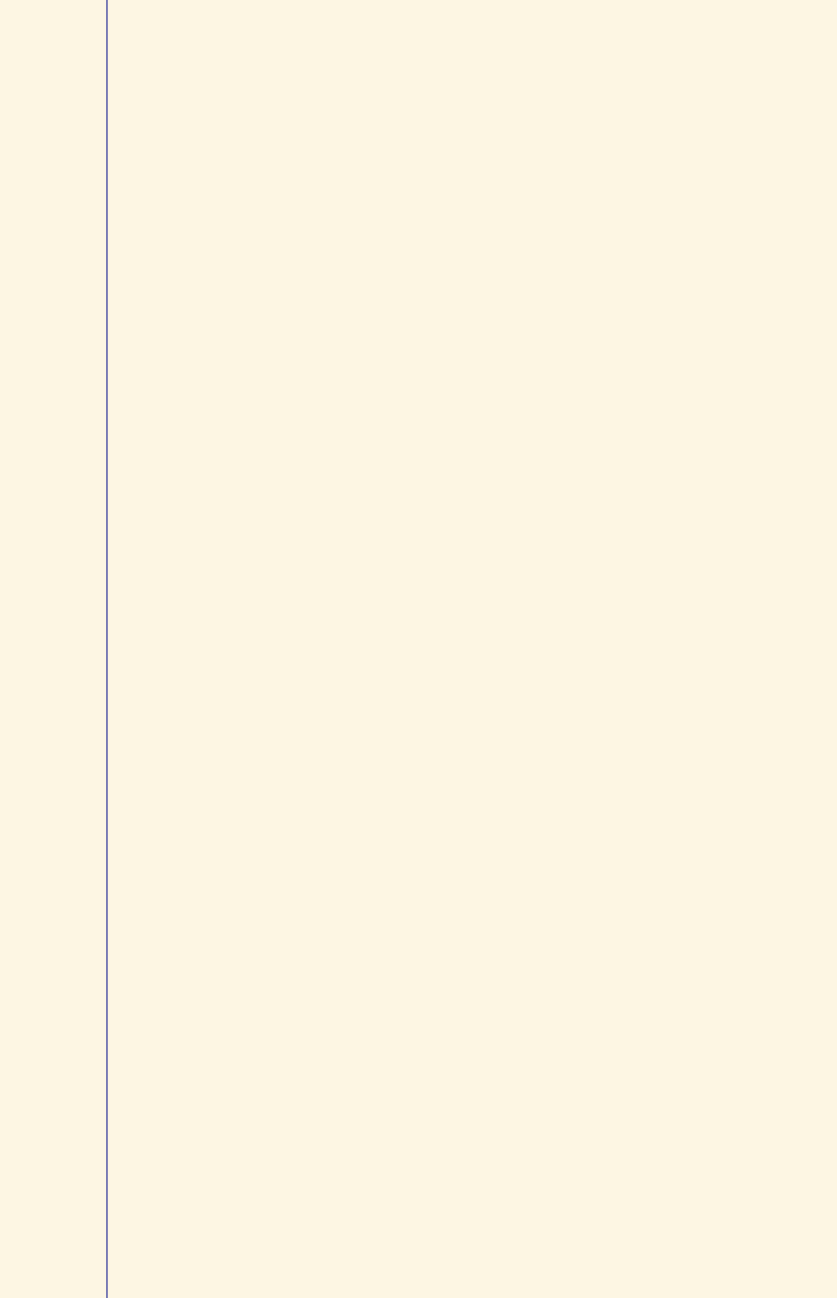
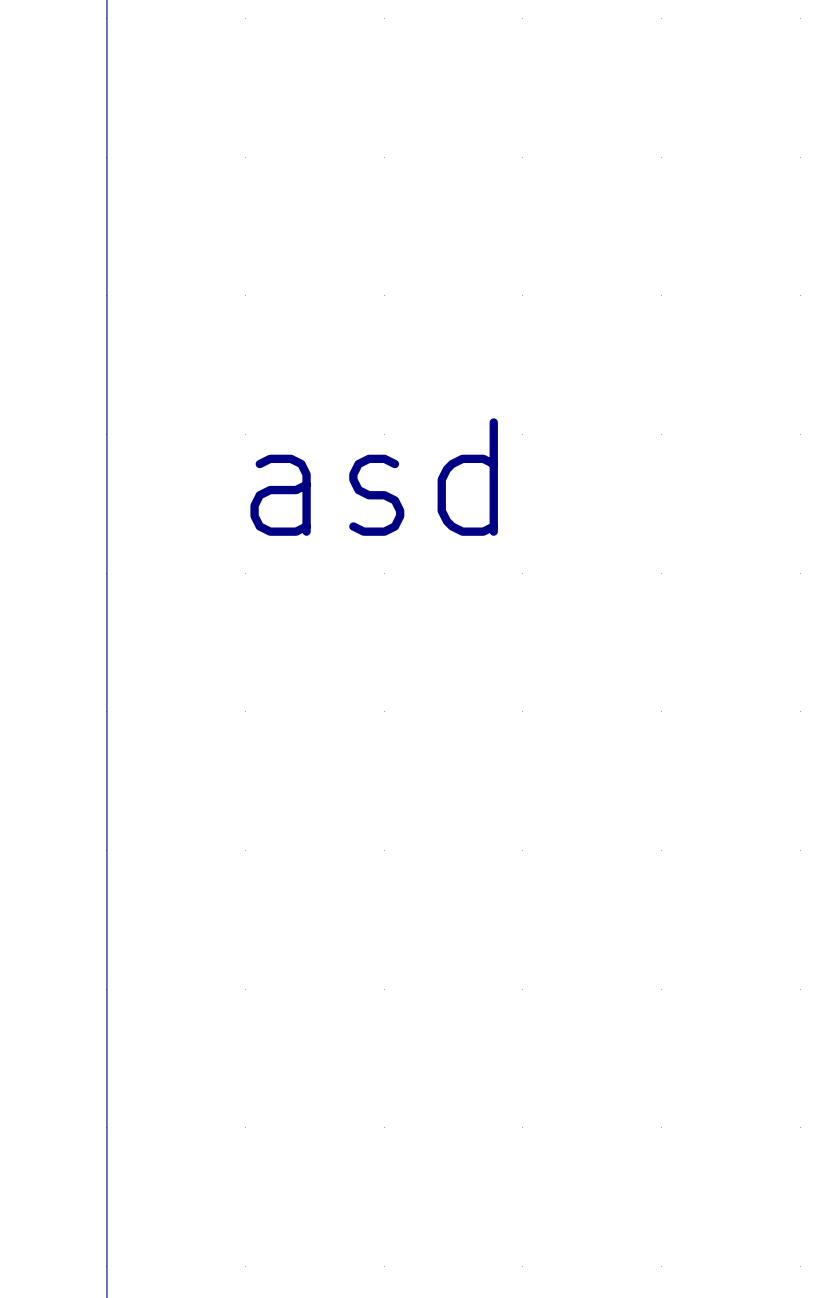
text: none -> asd (374, 477)

